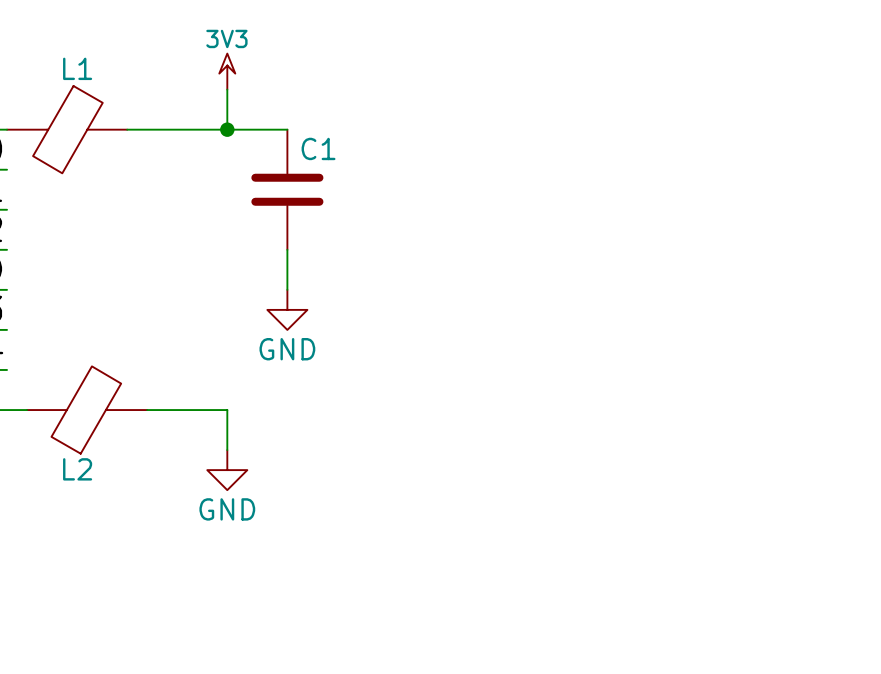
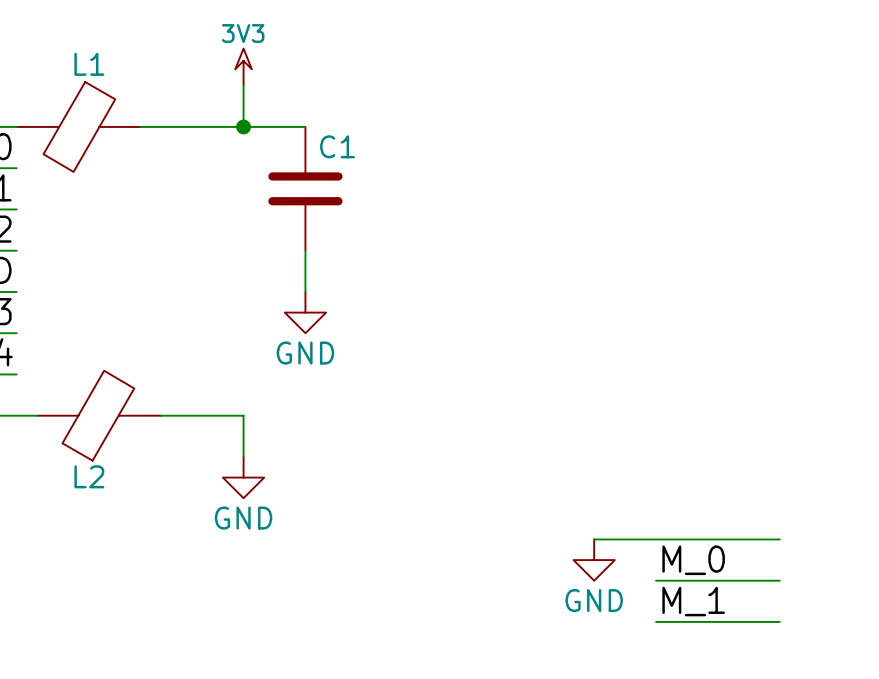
wire: none -> (594, 539) (779, 539)
power symbol: none -> GND (594, 560)
label: none -> M_0 (693, 560)
wire: none -> (656, 580) (779, 580)
label: none -> M_1 (693, 601)
wire: none -> (656, 621) (779, 621)

